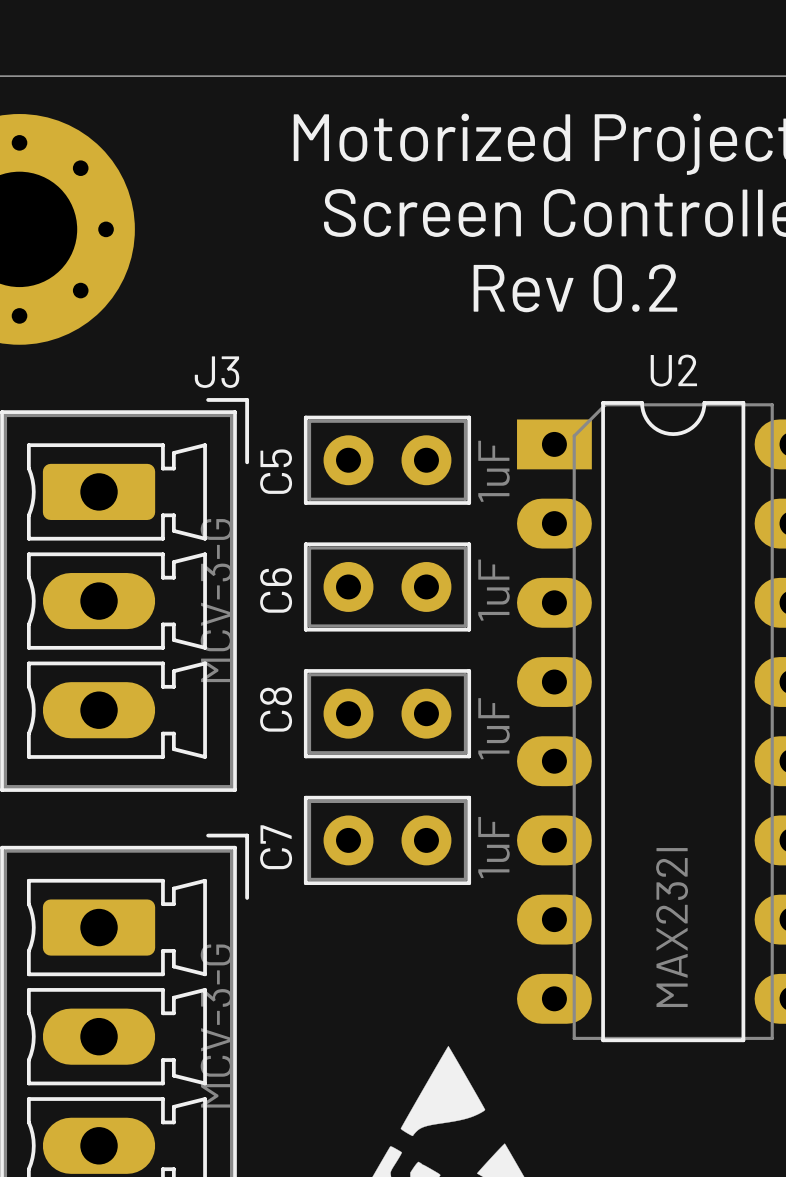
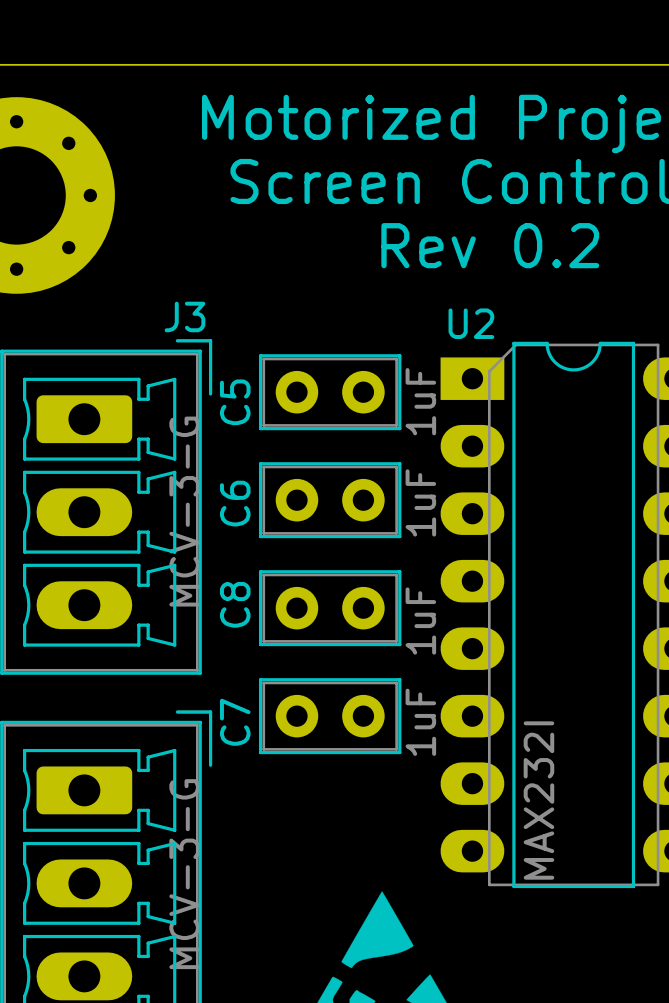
U2 name position: U2 (673, 370) -> U2 (471, 323)
U2 value position: MAX232I (672, 927) -> MAX232I (538, 800)

